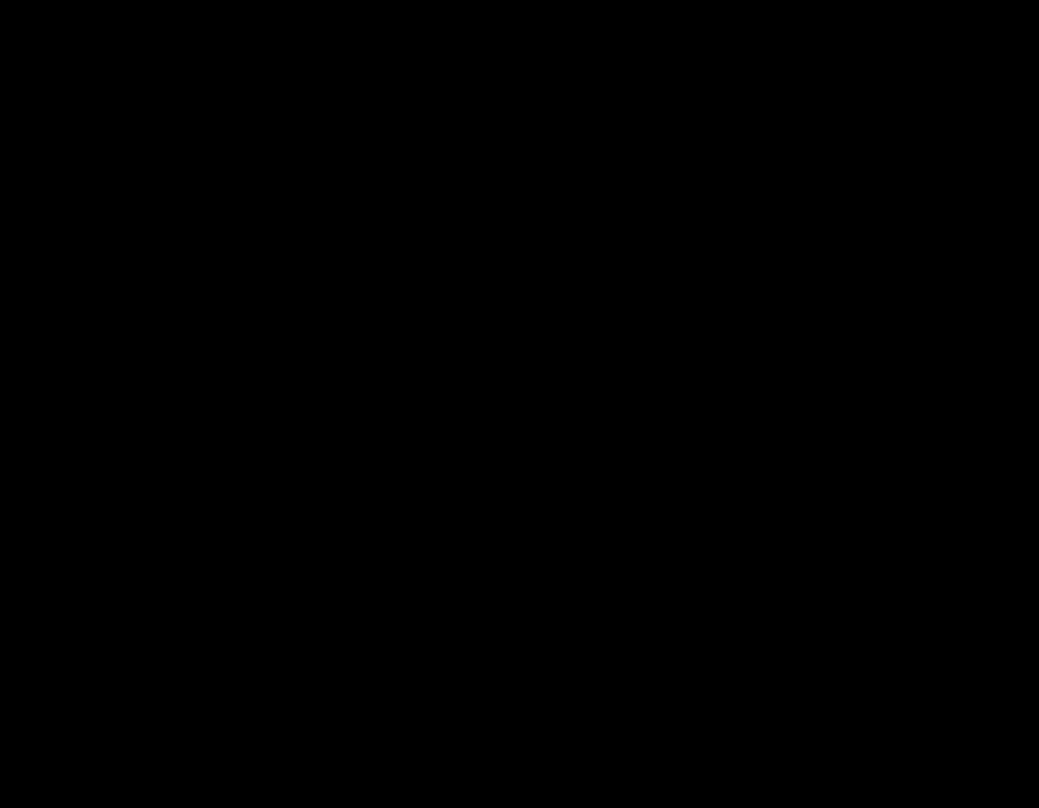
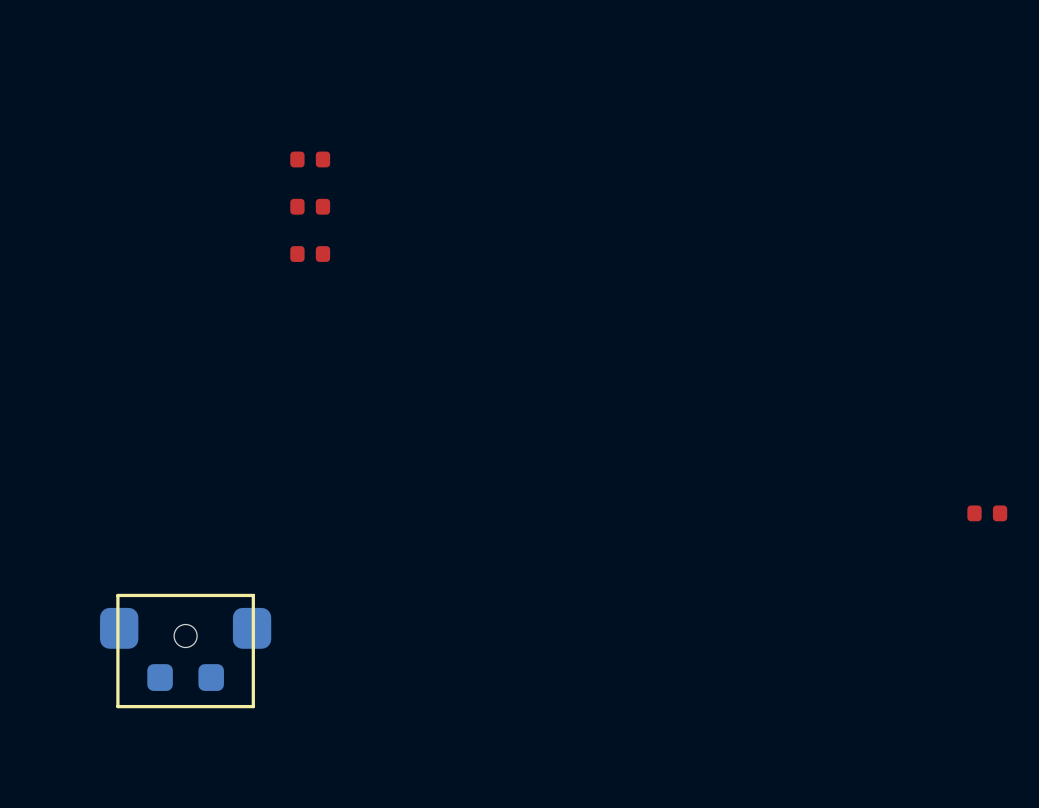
part: none -> (310, 159)
part: none -> (310, 206)
part: none -> (310, 254)
part: none -> (987, 513)
part: none -> (185, 651)

